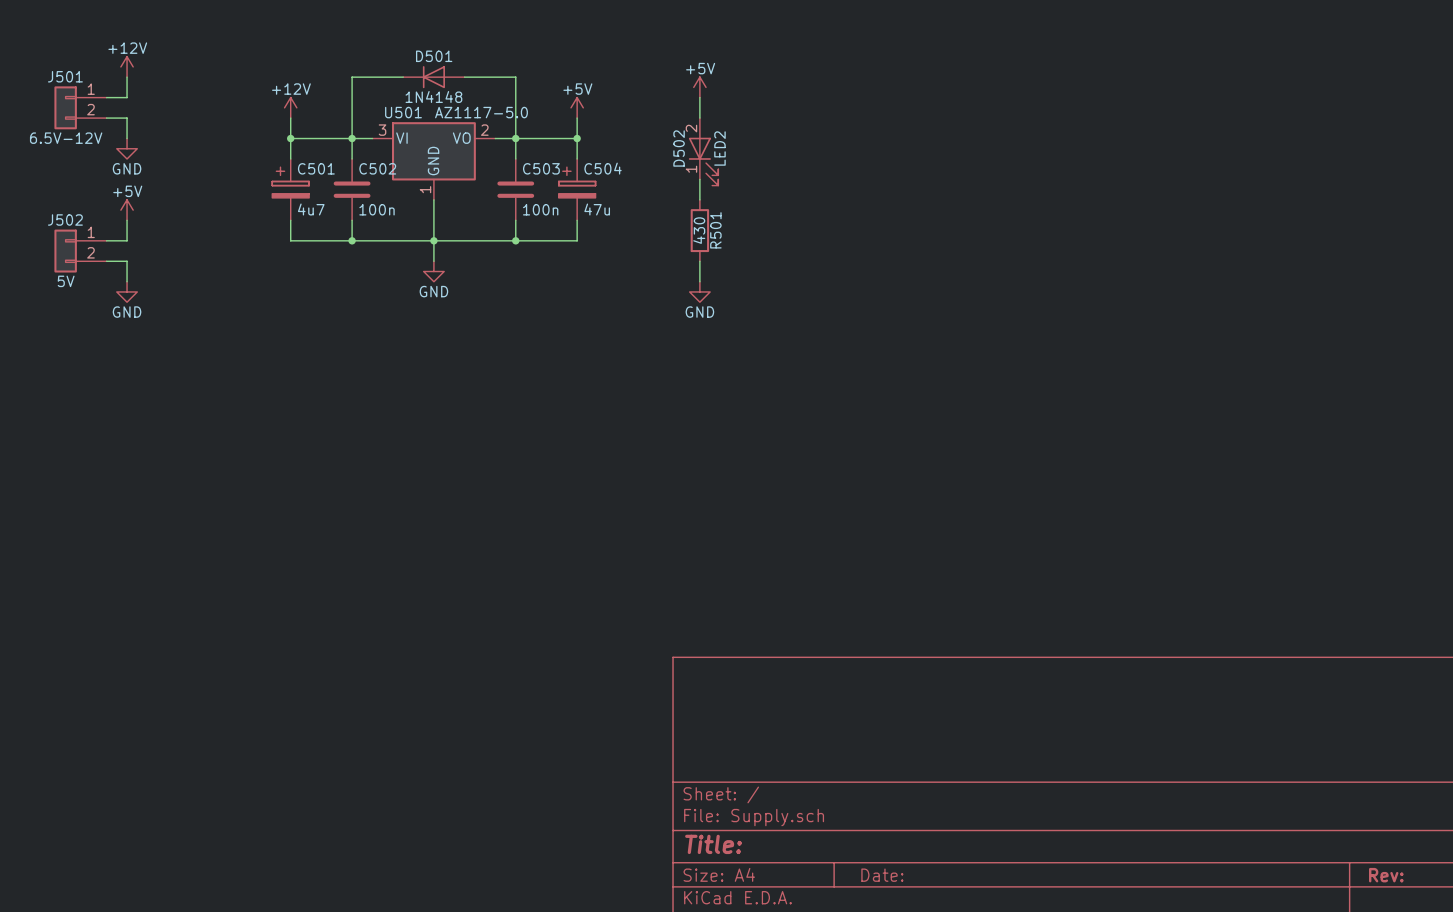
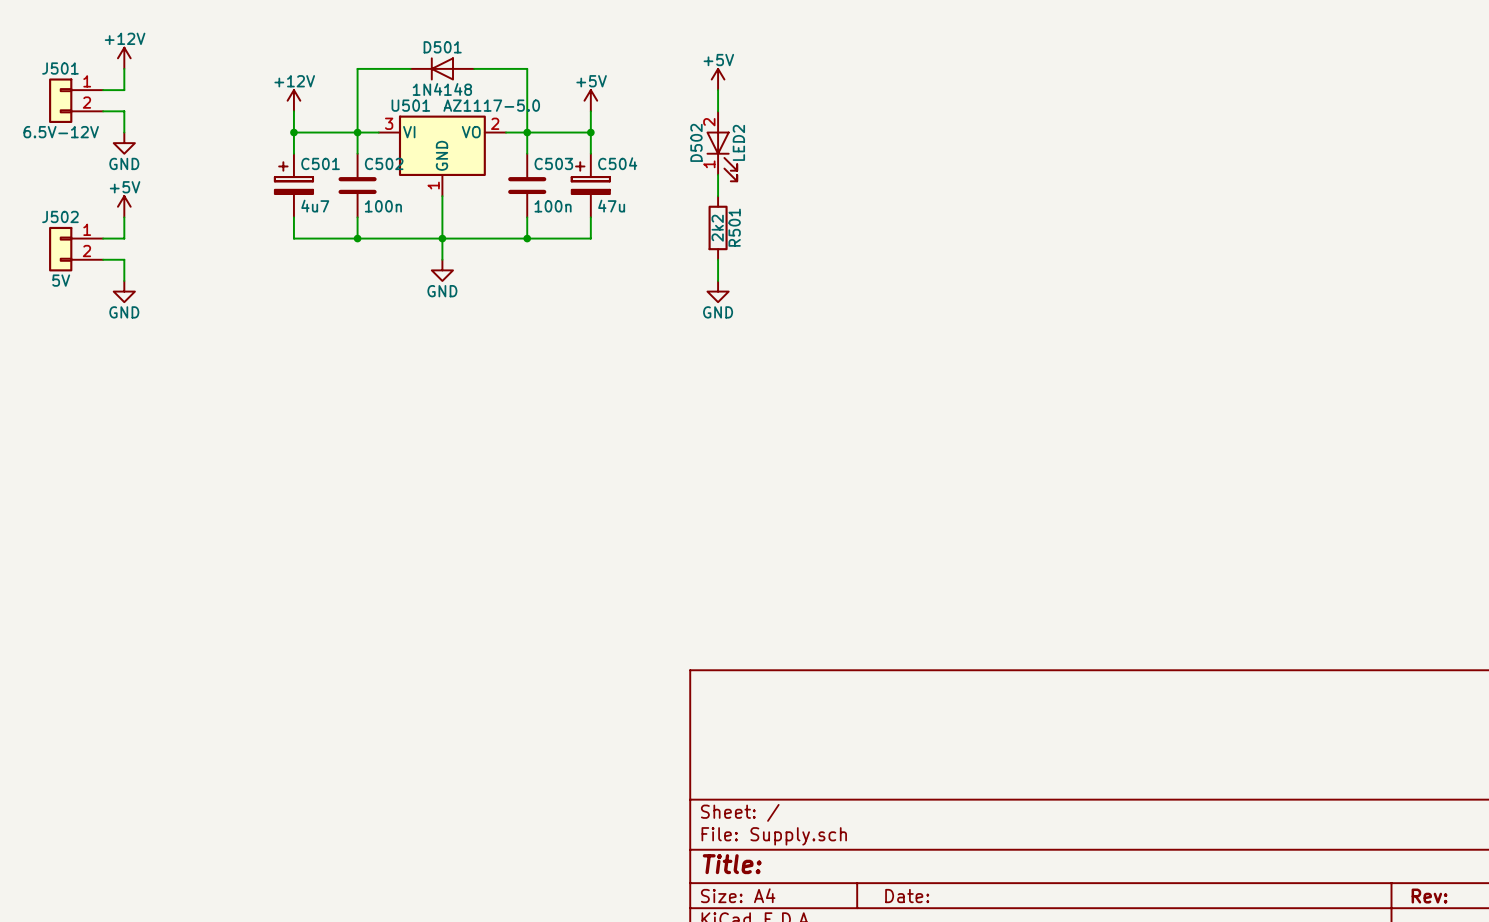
R501 value: 430 (699, 230) -> 2k2 (717, 228)

